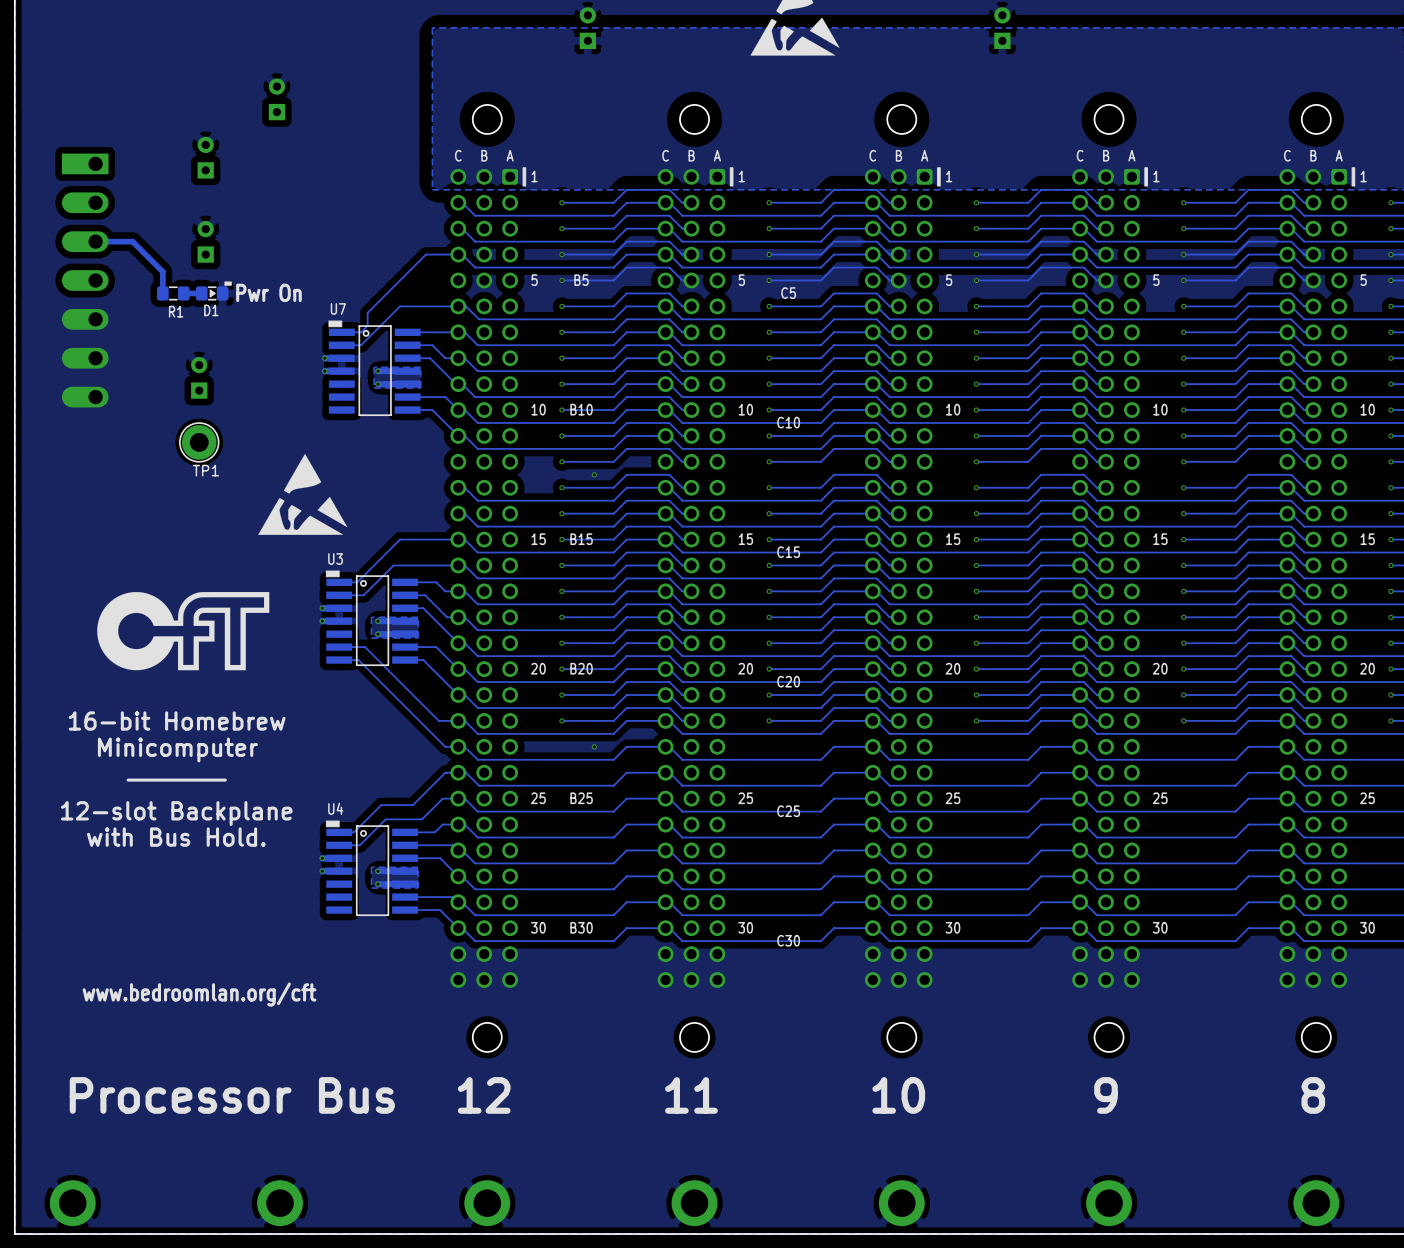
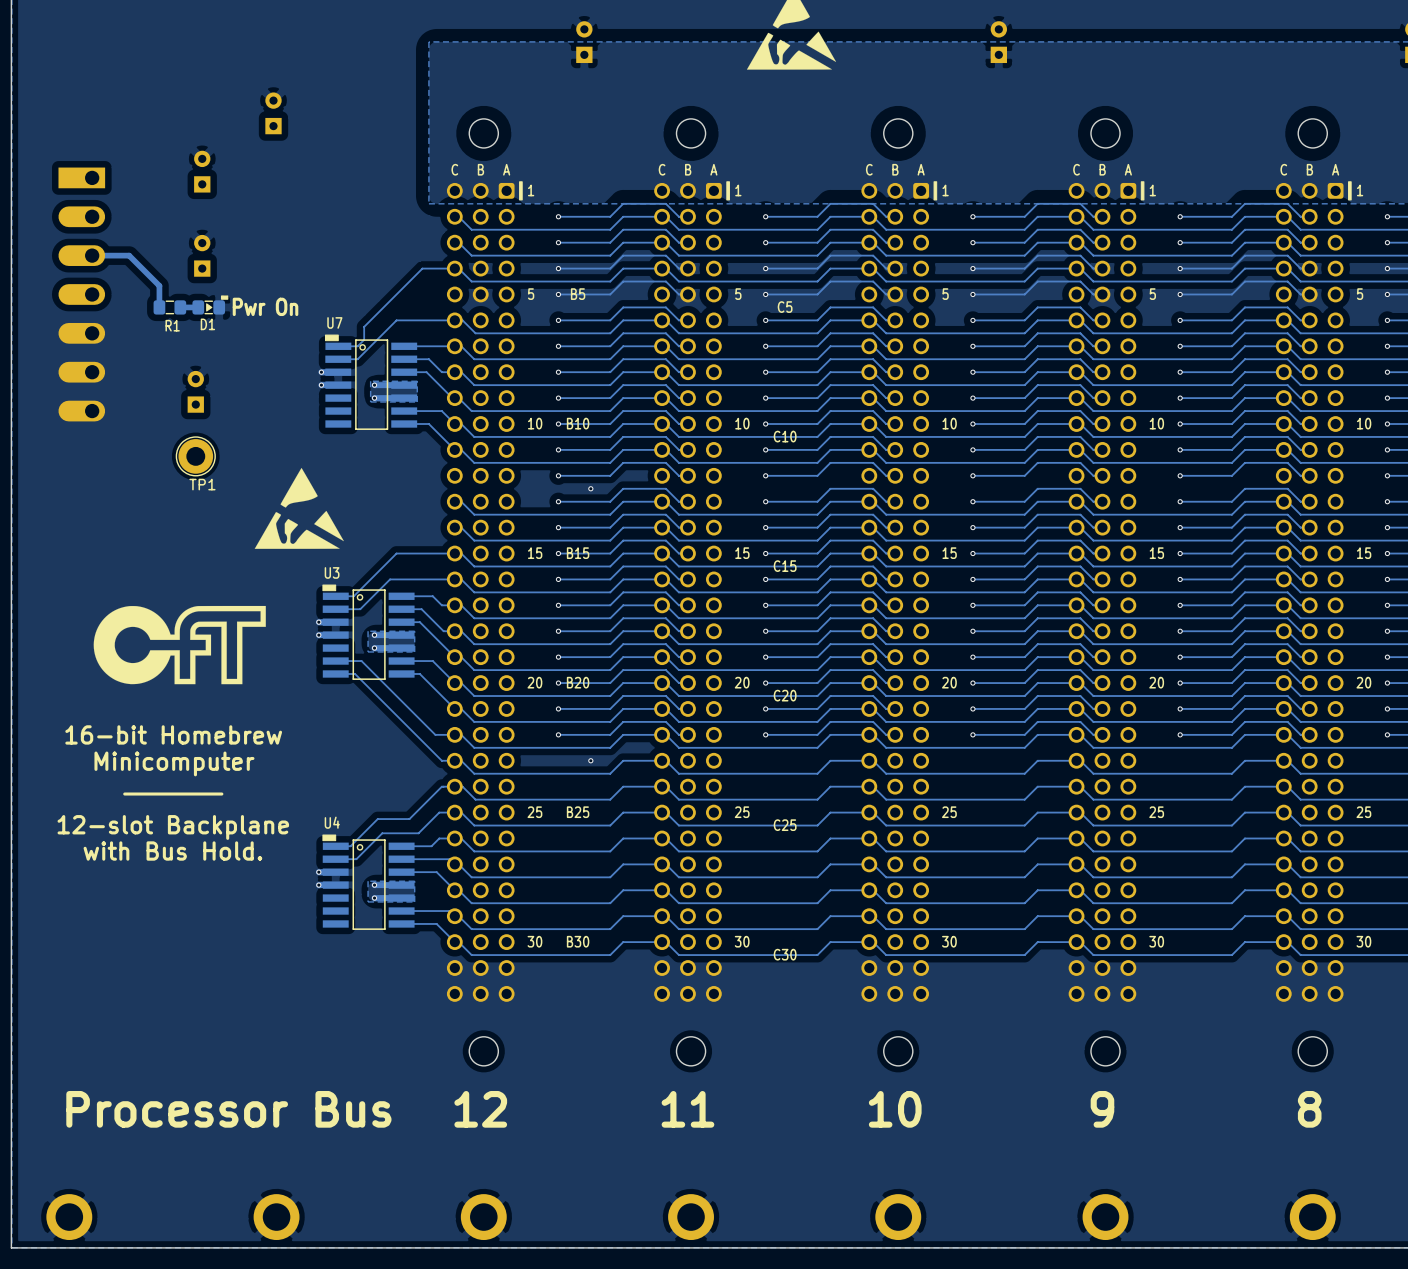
text: www.bedroomlan.org/cft (199, 994) -> none

